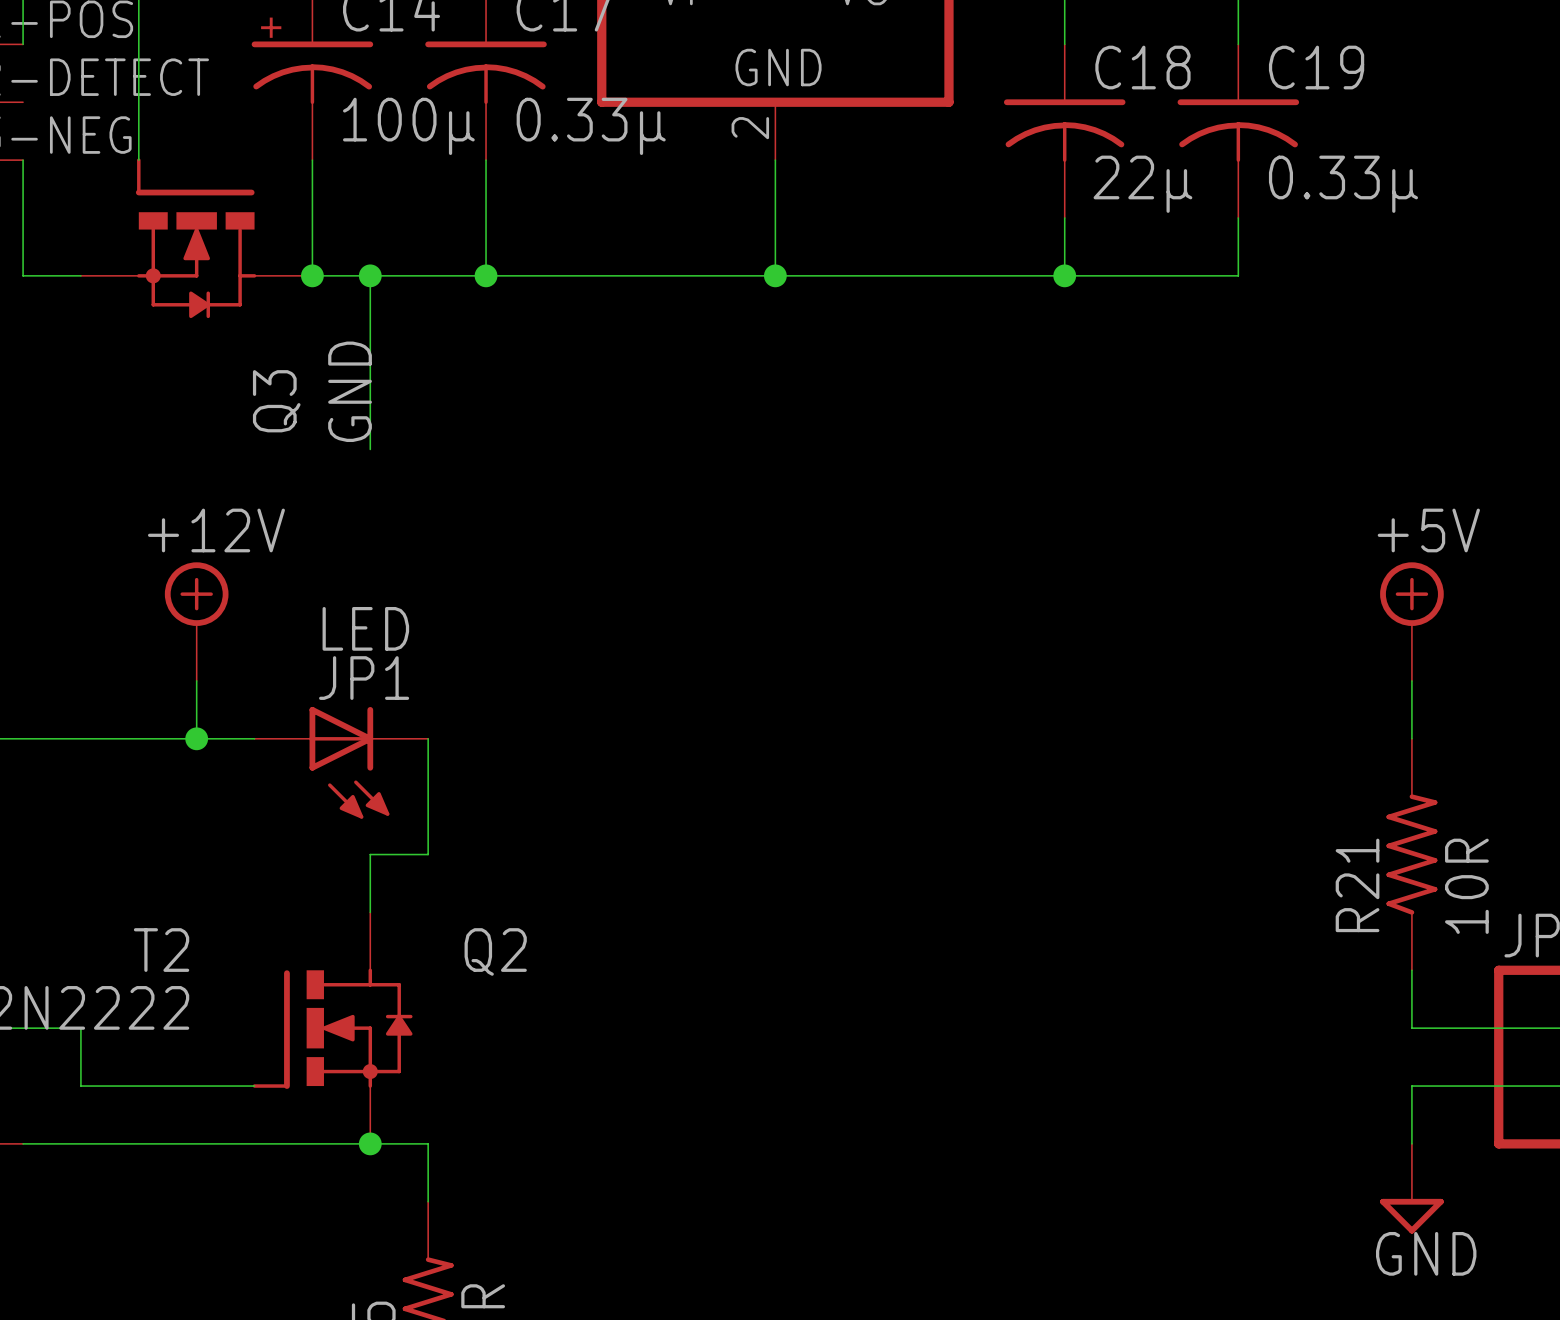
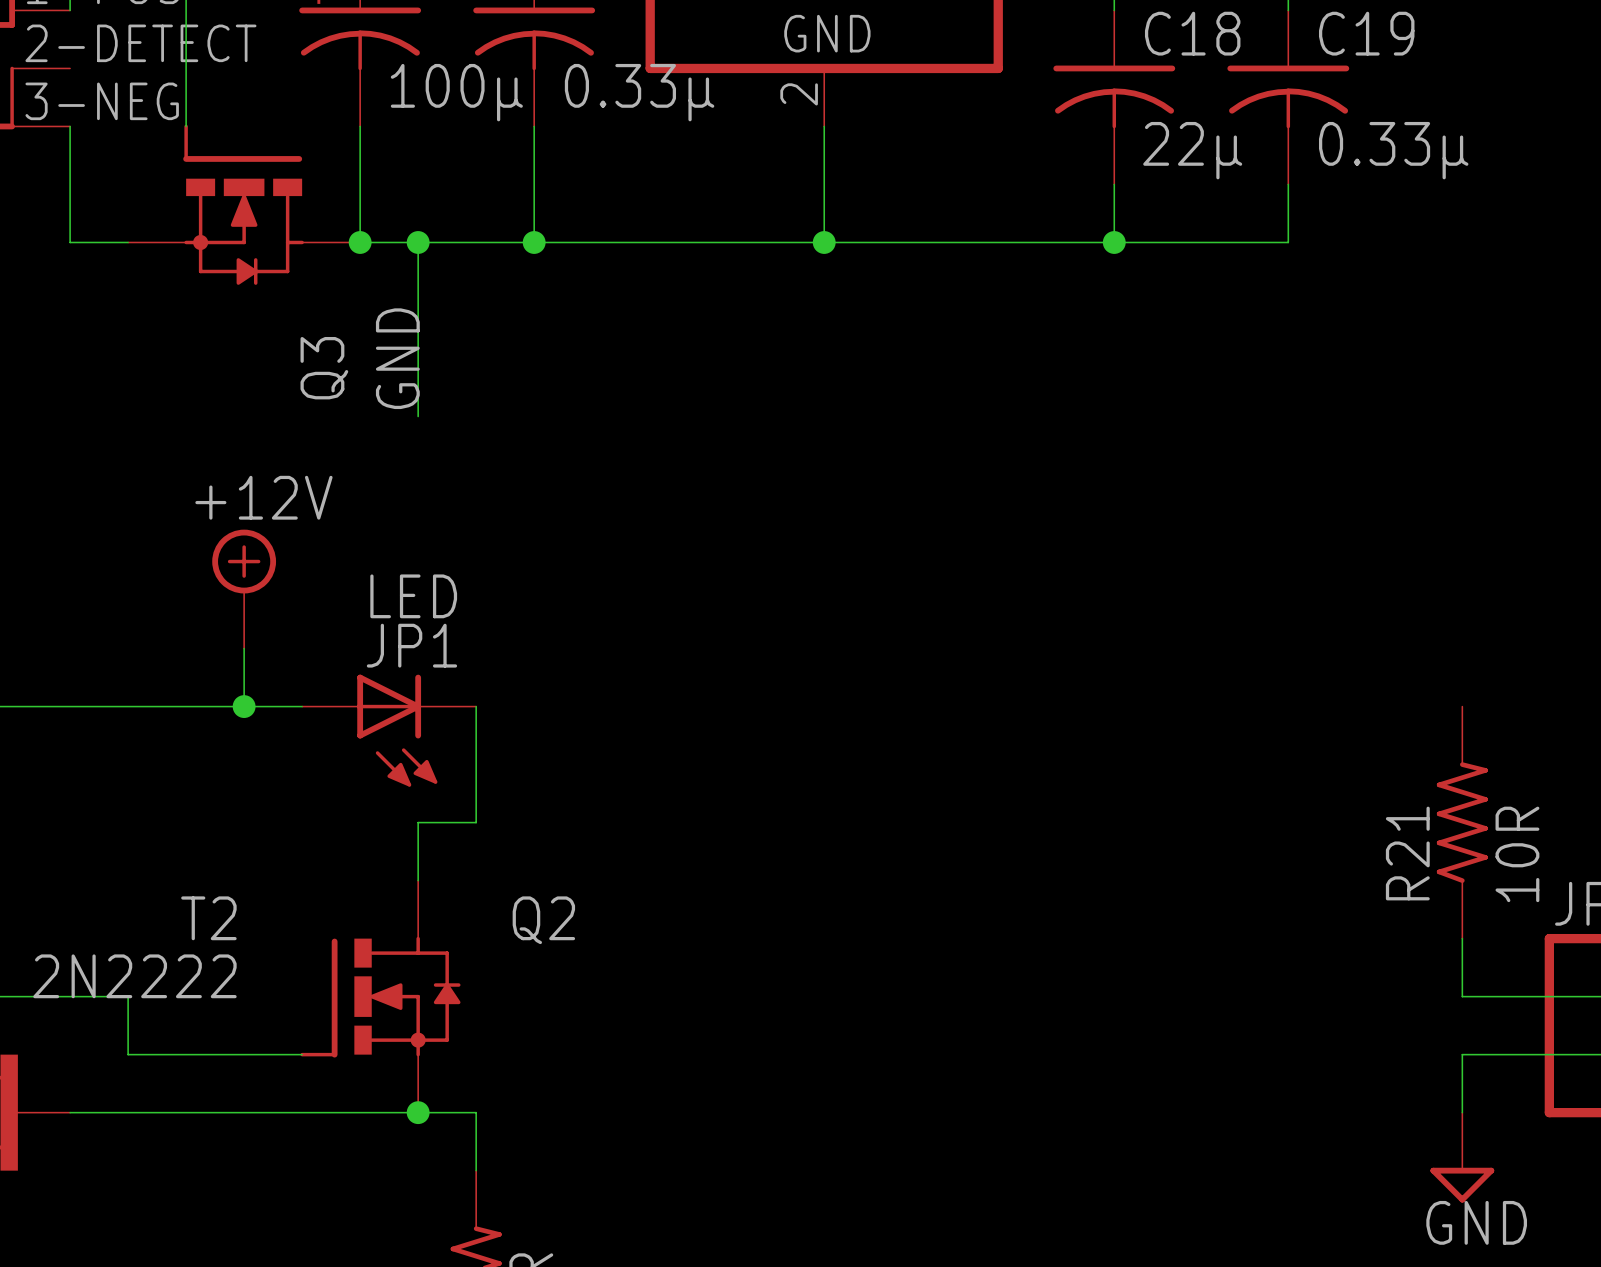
power symbol: +5V (1411, 621) -> none
wire: (1411, 680) (1411, 738) -> none

